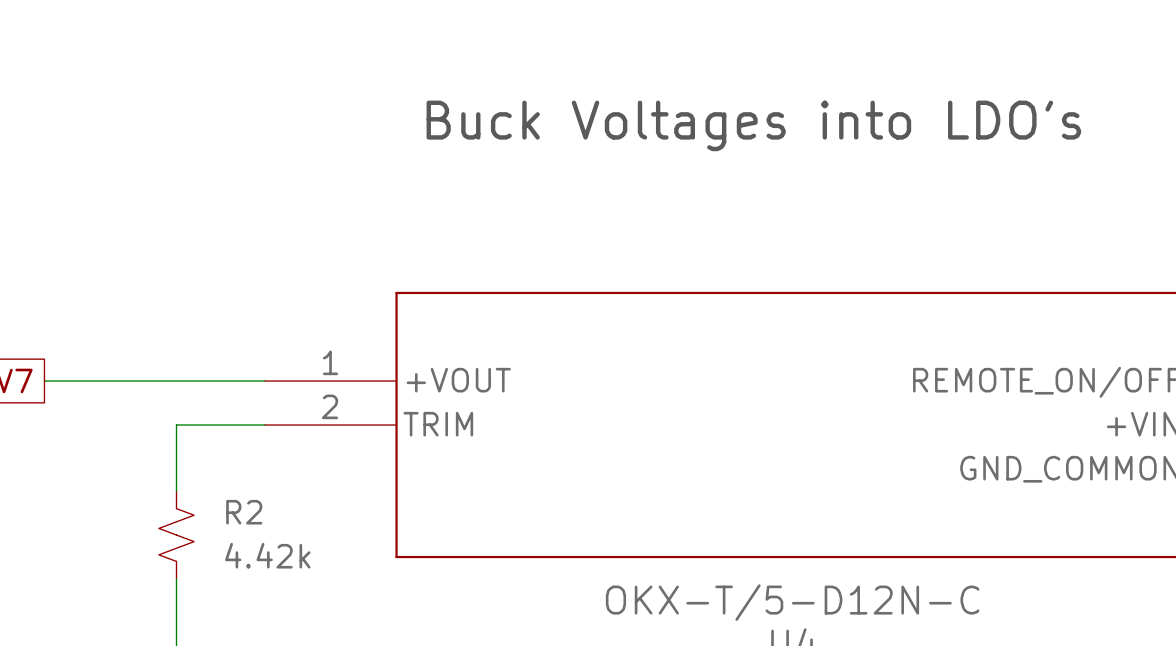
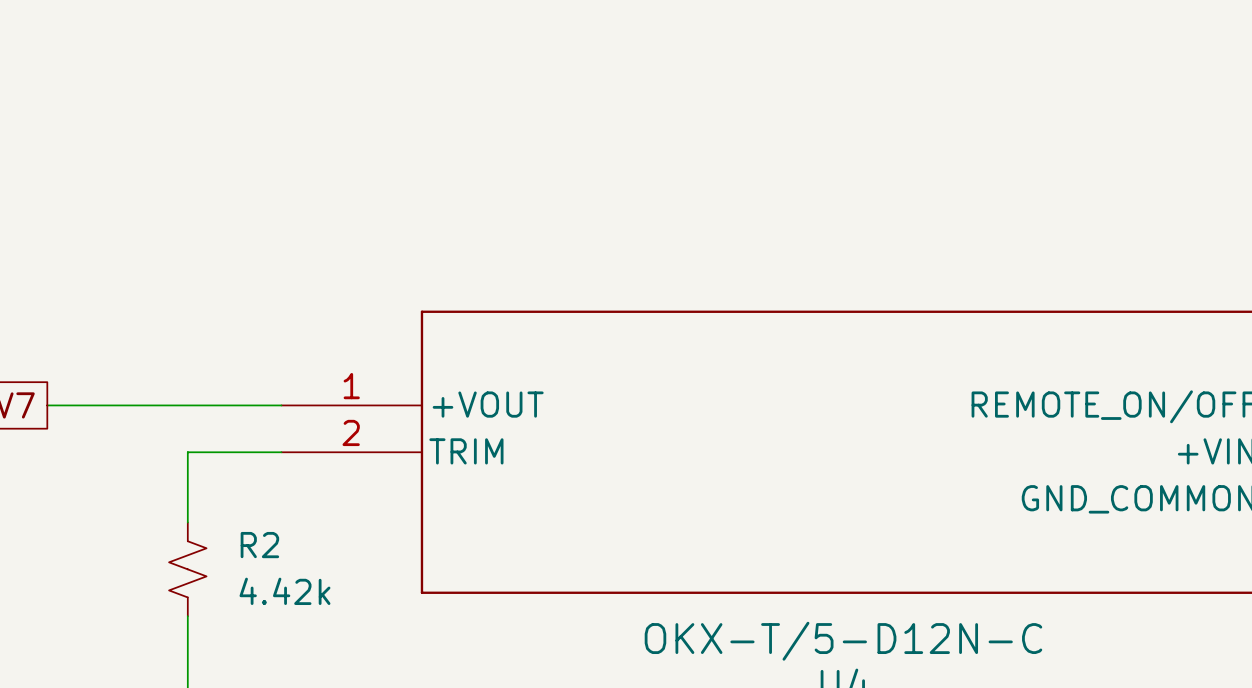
text: Buck Voltages into LDO's (753, 125) -> none

